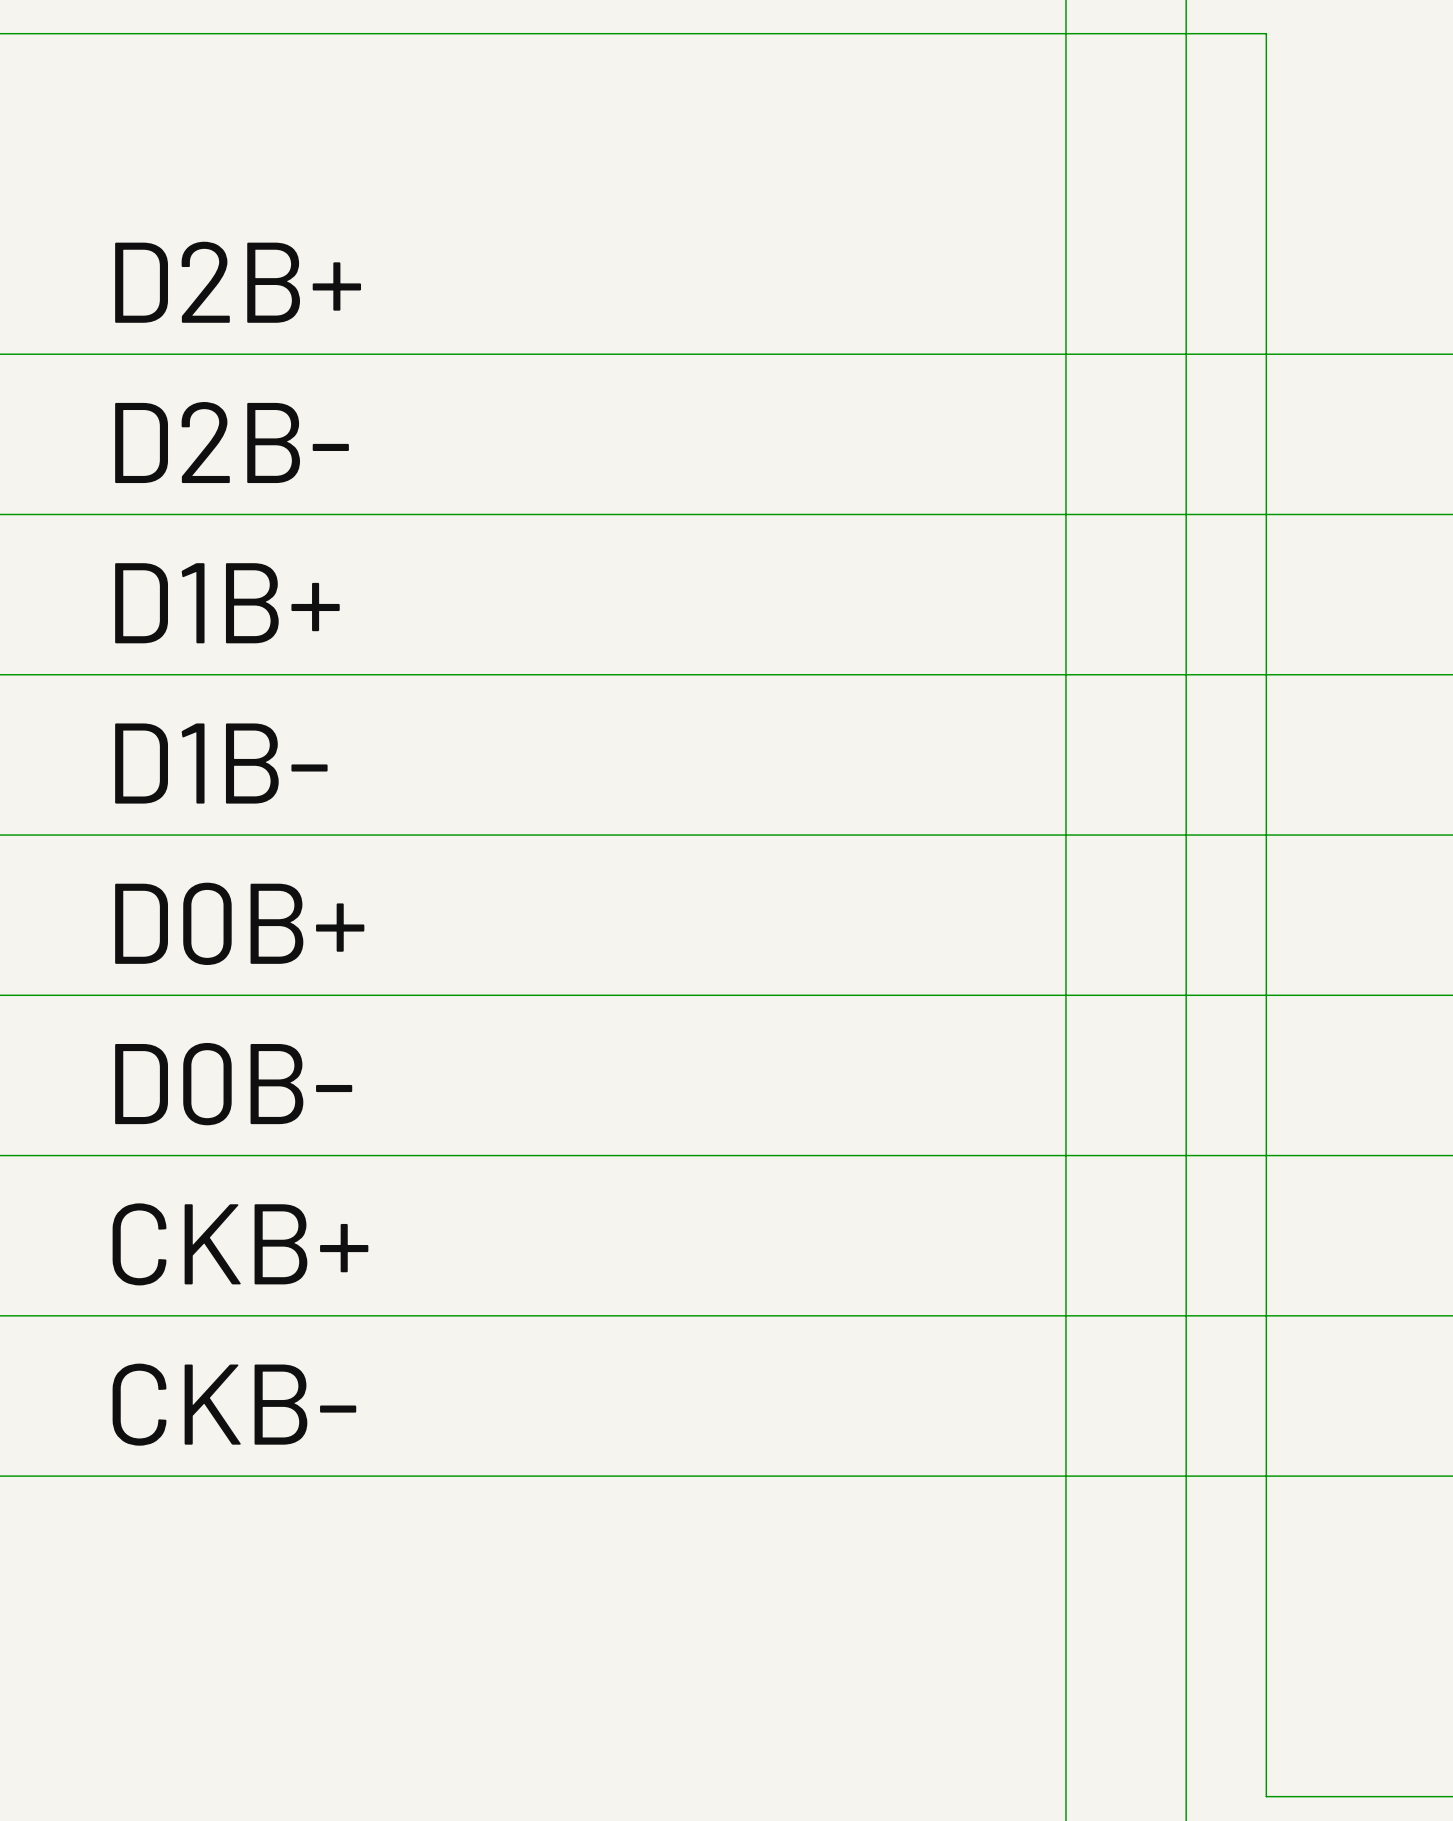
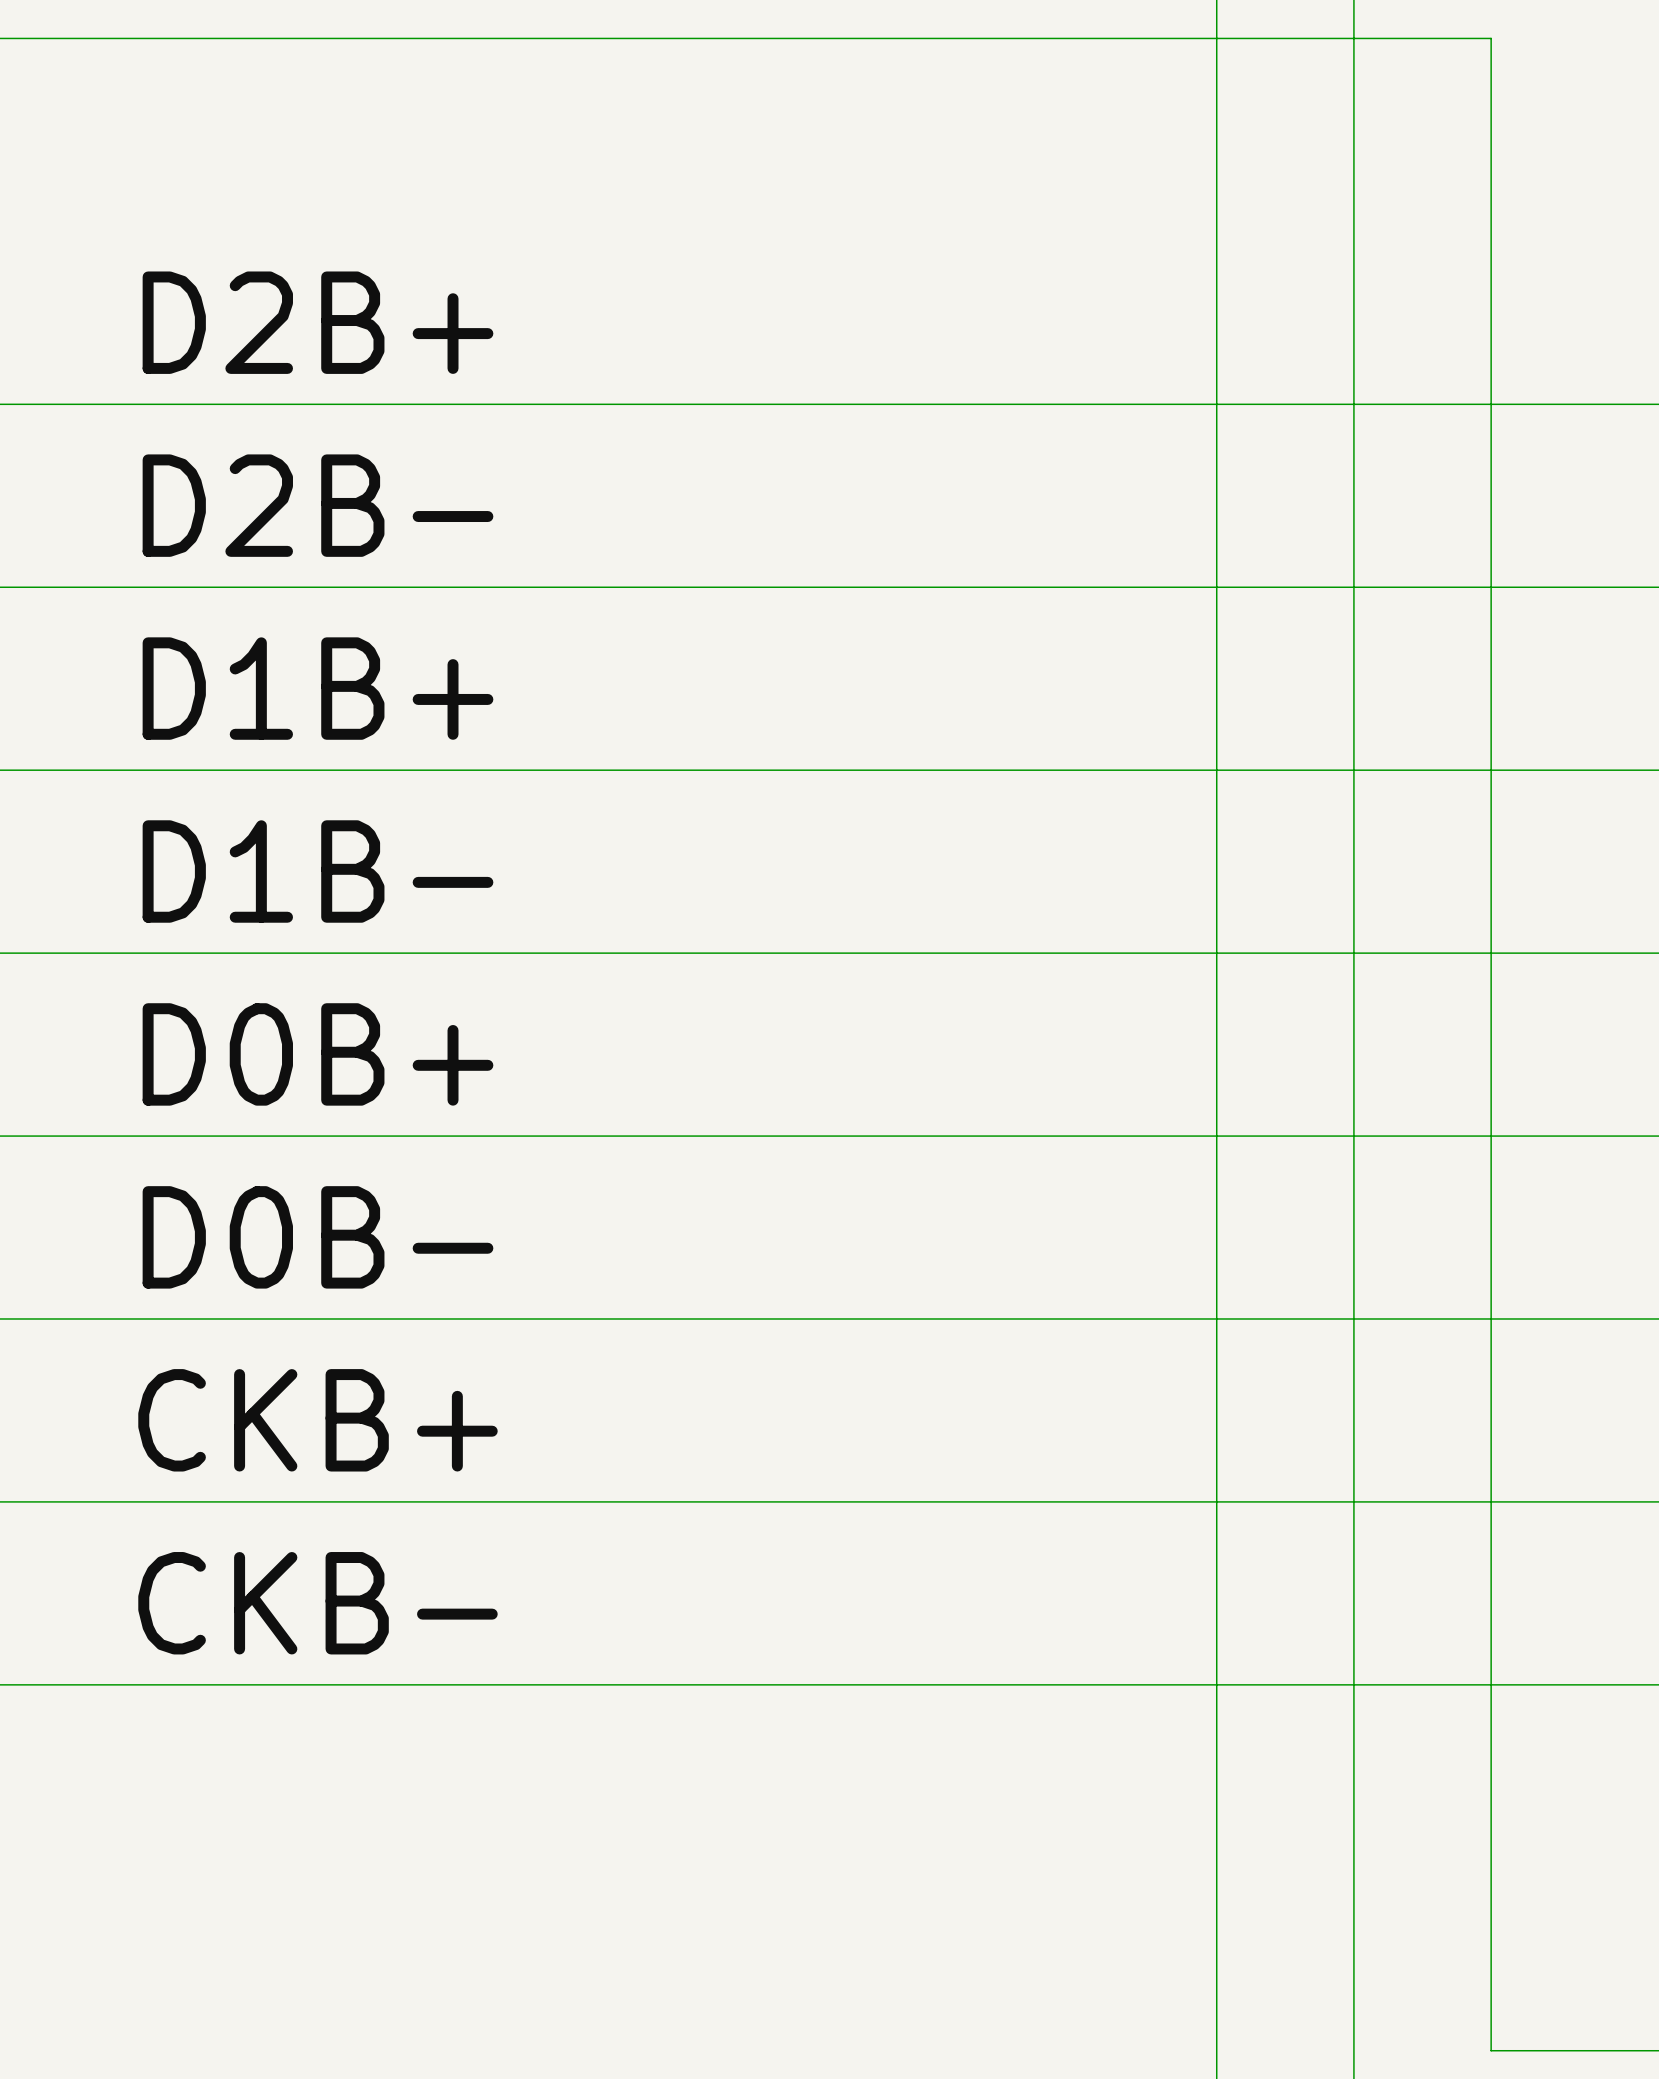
wire: (1266, 33) (1266, 1796) (1306, 1796) -> (1445, 38) (1491, 38) (1491, 2050)

